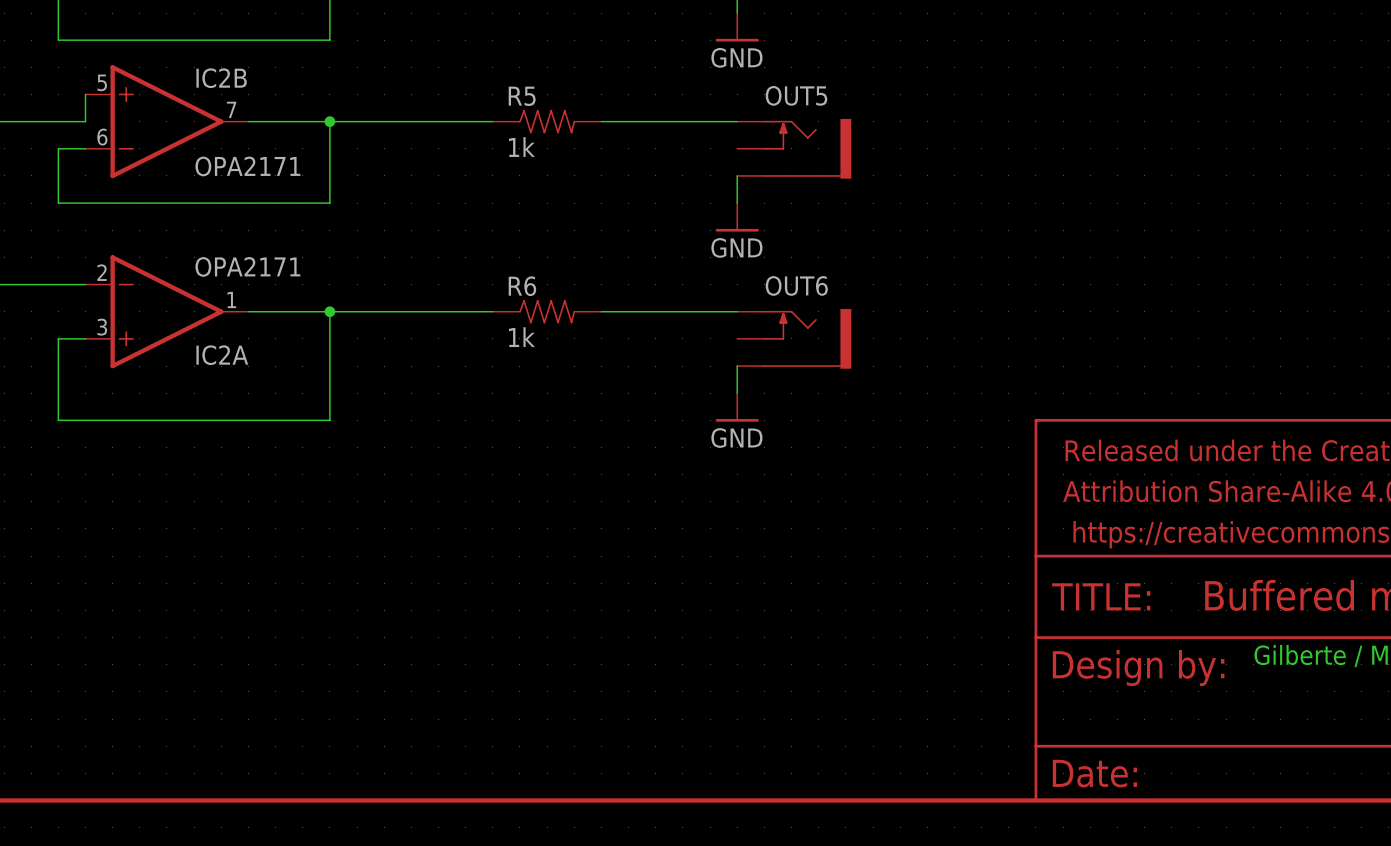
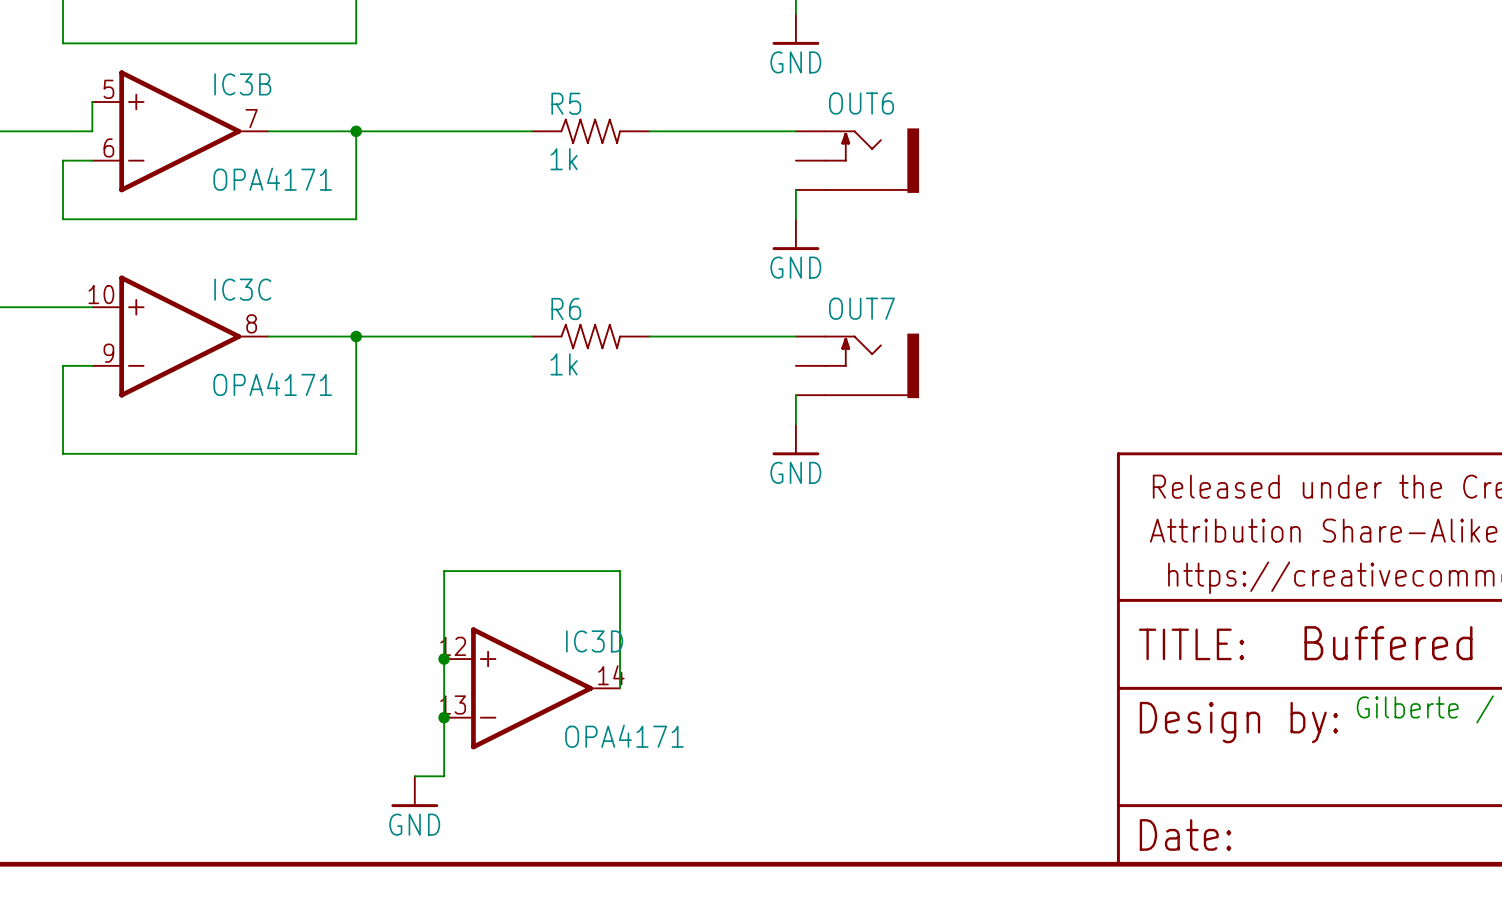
IC2B name: IC2B (221, 78) -> IC3B (242, 84)
OUT5 name: OUT5 (796, 95) -> OUT6 (861, 103)
IC2B value: OPA2171 (247, 166) -> OPA4171 (272, 179)
OUT6 name: OUT6 (796, 285) -> OUT7 (861, 308)
IC2A: OPA2171 (166, 311) -> none
IC3C: none -> OPA4171 (180, 336)
junction: none -> (444, 659)
IC3D: none -> OPA4171 (532, 688)
wire: none -> (620, 688) (620, 571) (444, 571) (444, 776) (414, 776)
junction: none -> (444, 717)
power symbol: none -> GND (414, 791)

